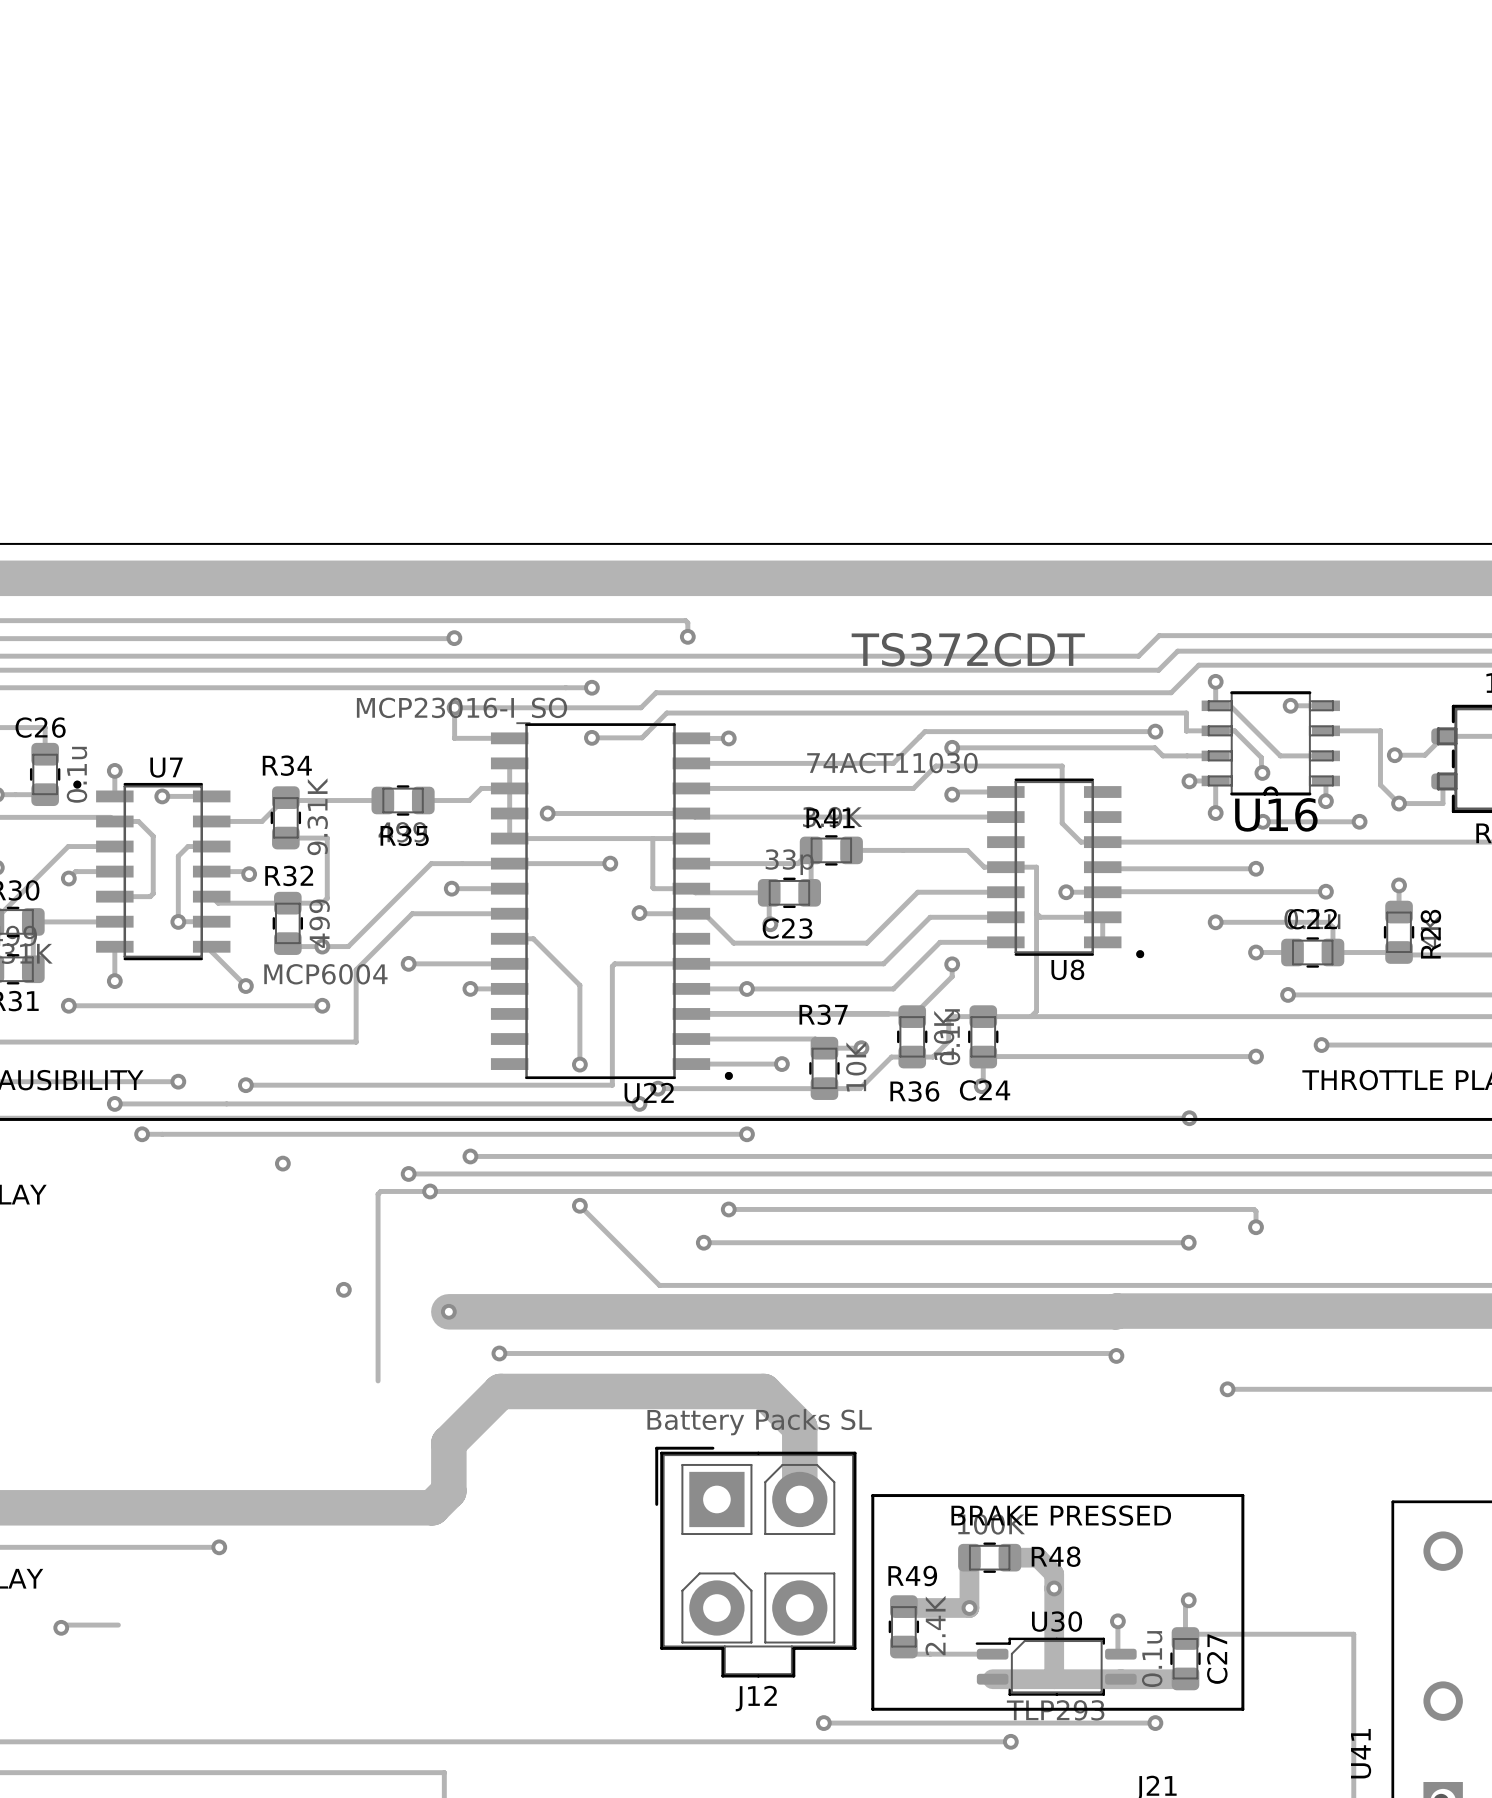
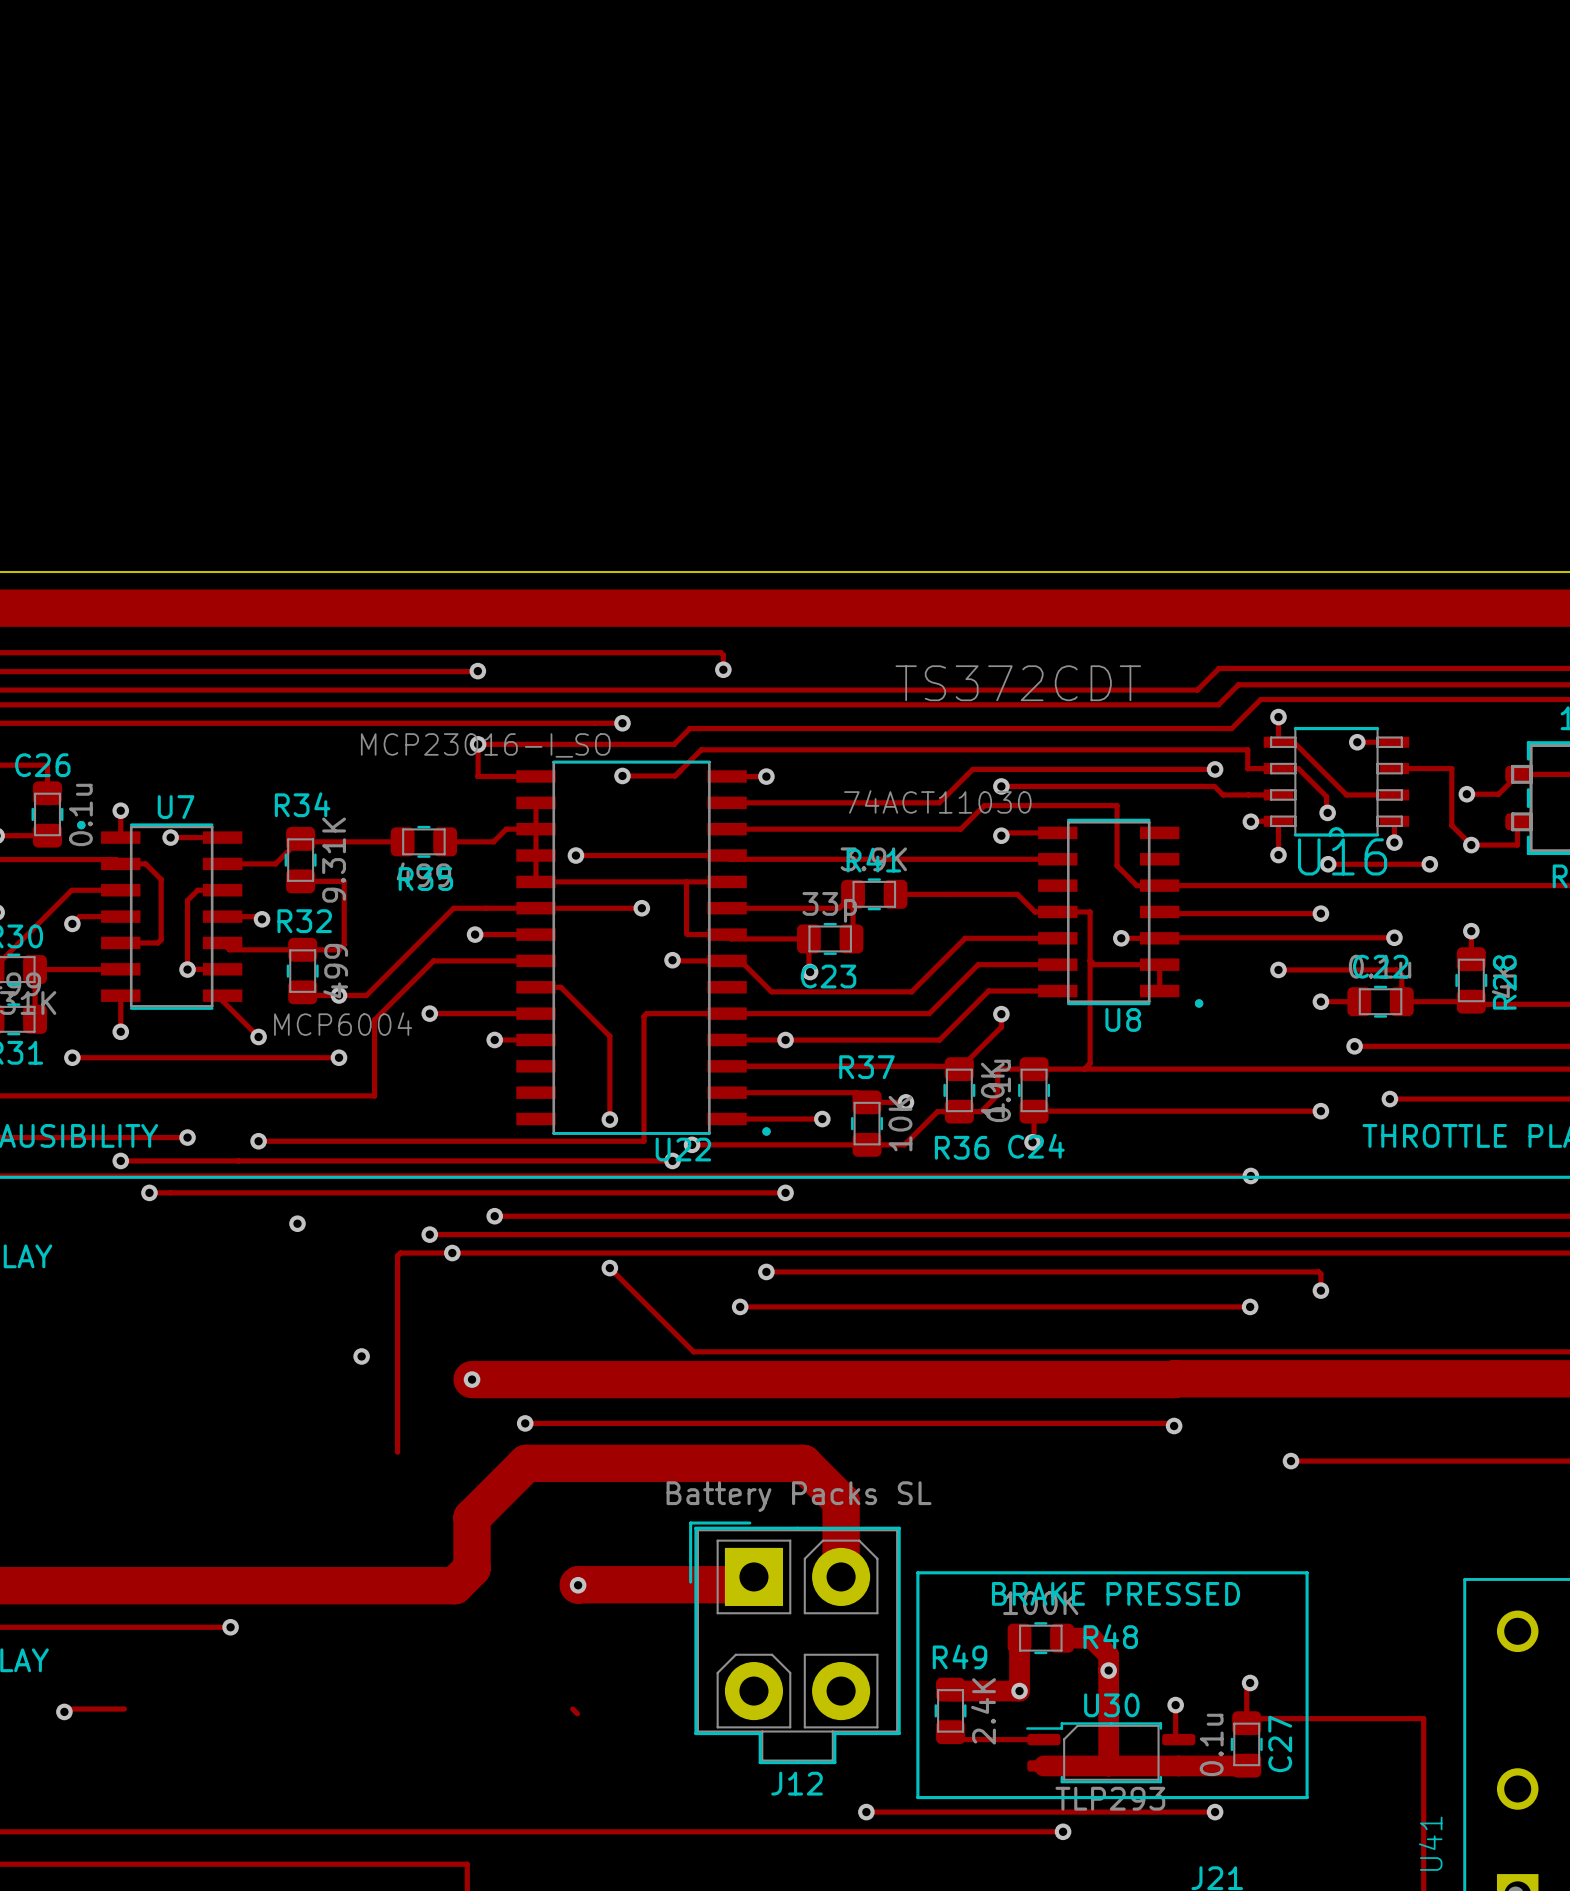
track: none -> (745, 1584) (578, 1585)
via: none -> (578, 1585)
track: none -> (572, 1709) (577, 1713)

